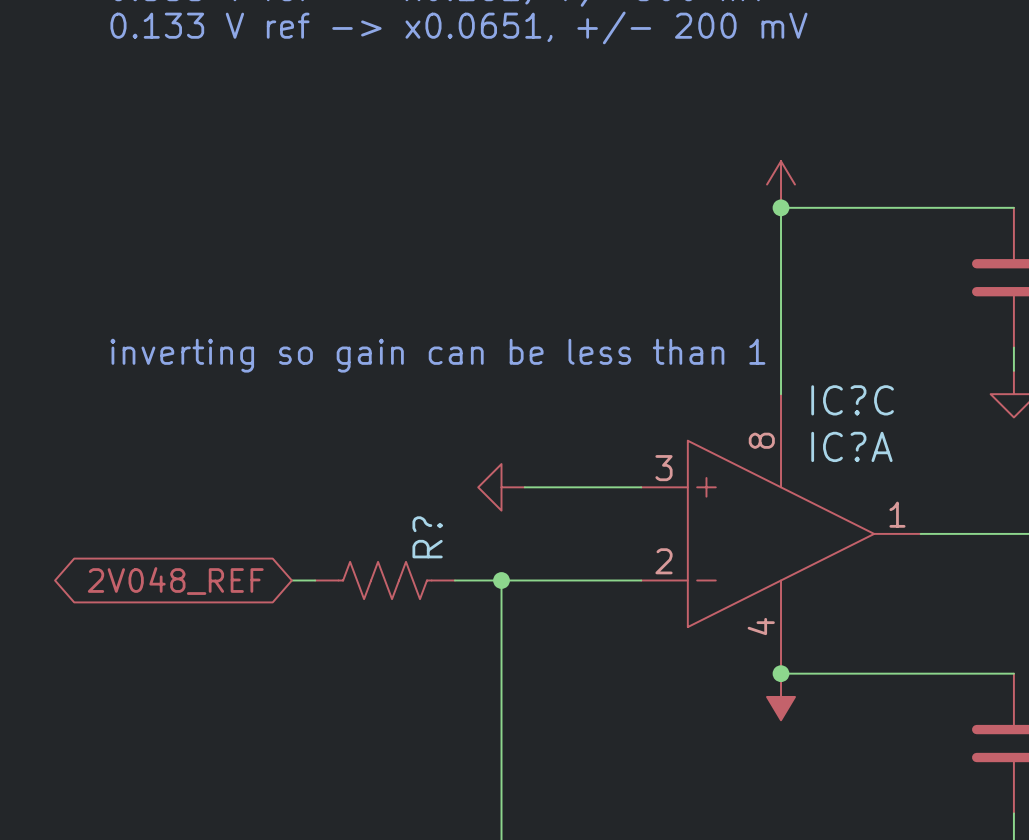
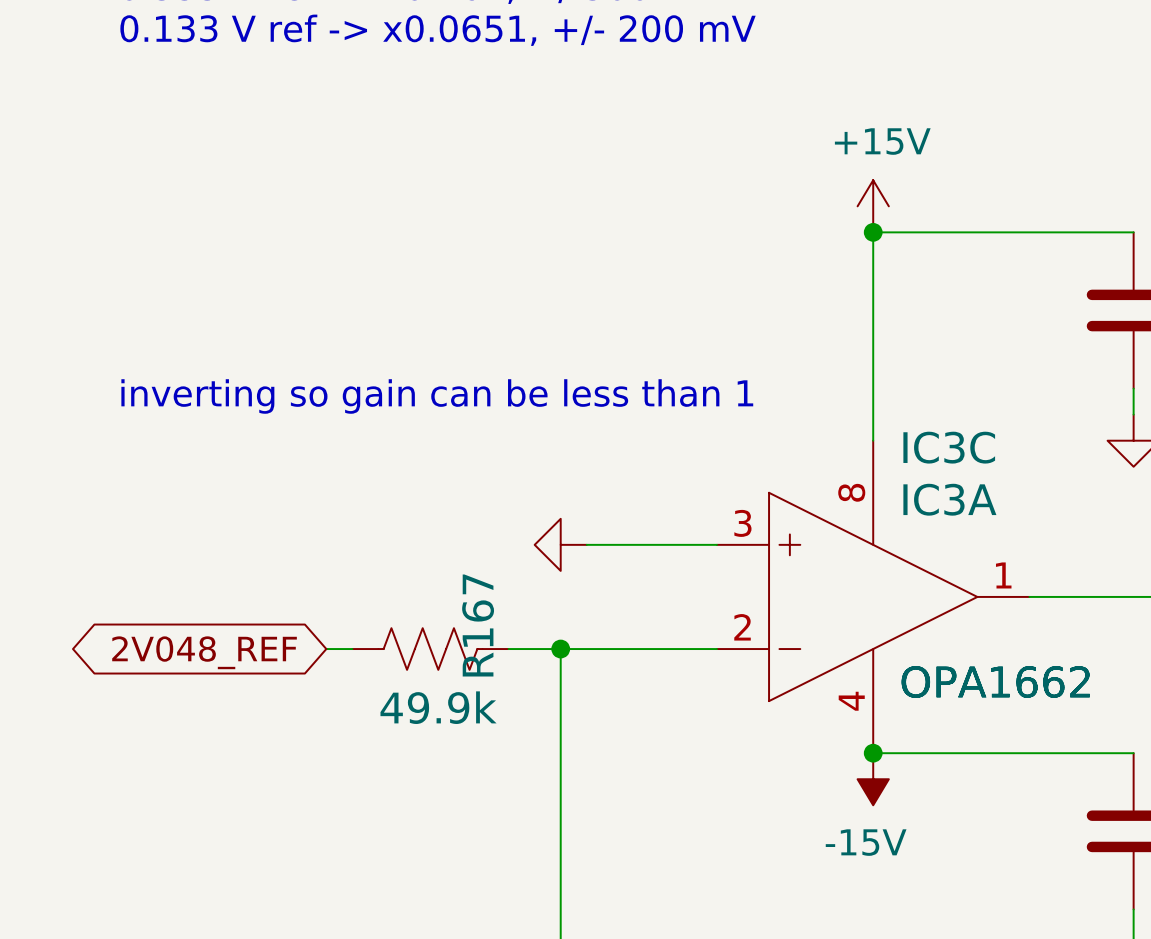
power symbol text: none -> +15V (882, 141)
IC?C name: IC?C (852, 400) -> IC3C (949, 447)
IC?A name: IC?A (851, 446) -> IC3A (949, 499)
R? name: R? (427, 537) -> R167 (478, 625)
IC?A value: none -> OPA1662 (995, 682)
IC?C value: none -> OPA1662 (995, 682)
R? value: none -> 49.9k (438, 707)
power symbol text: none -> -15V (866, 842)

